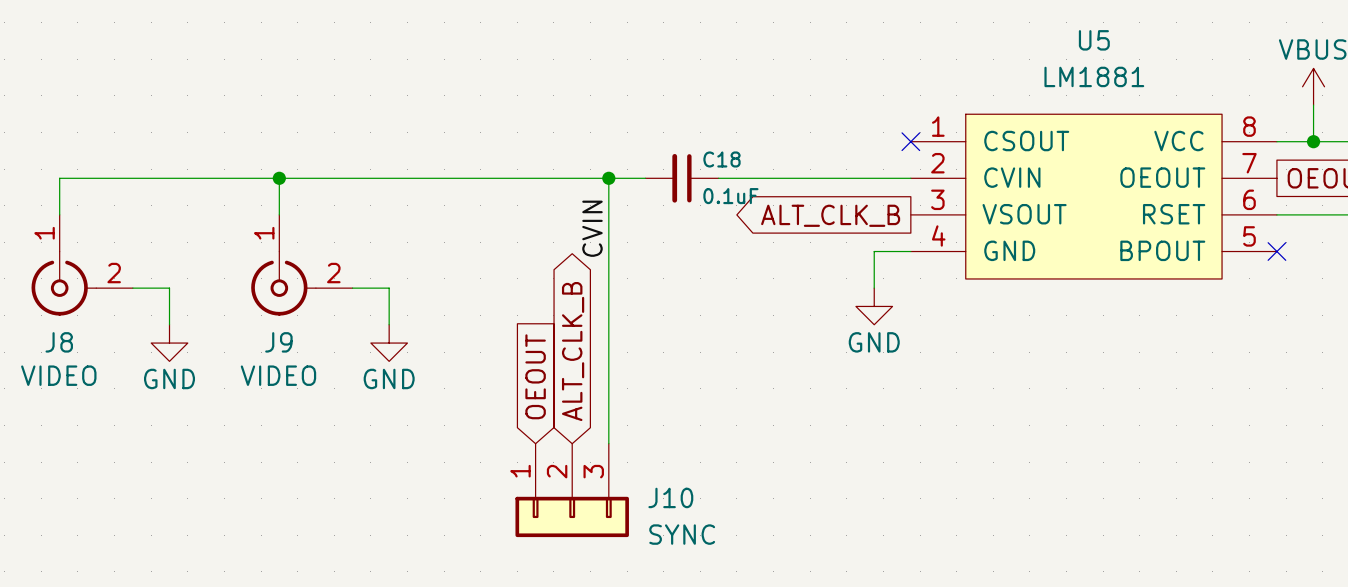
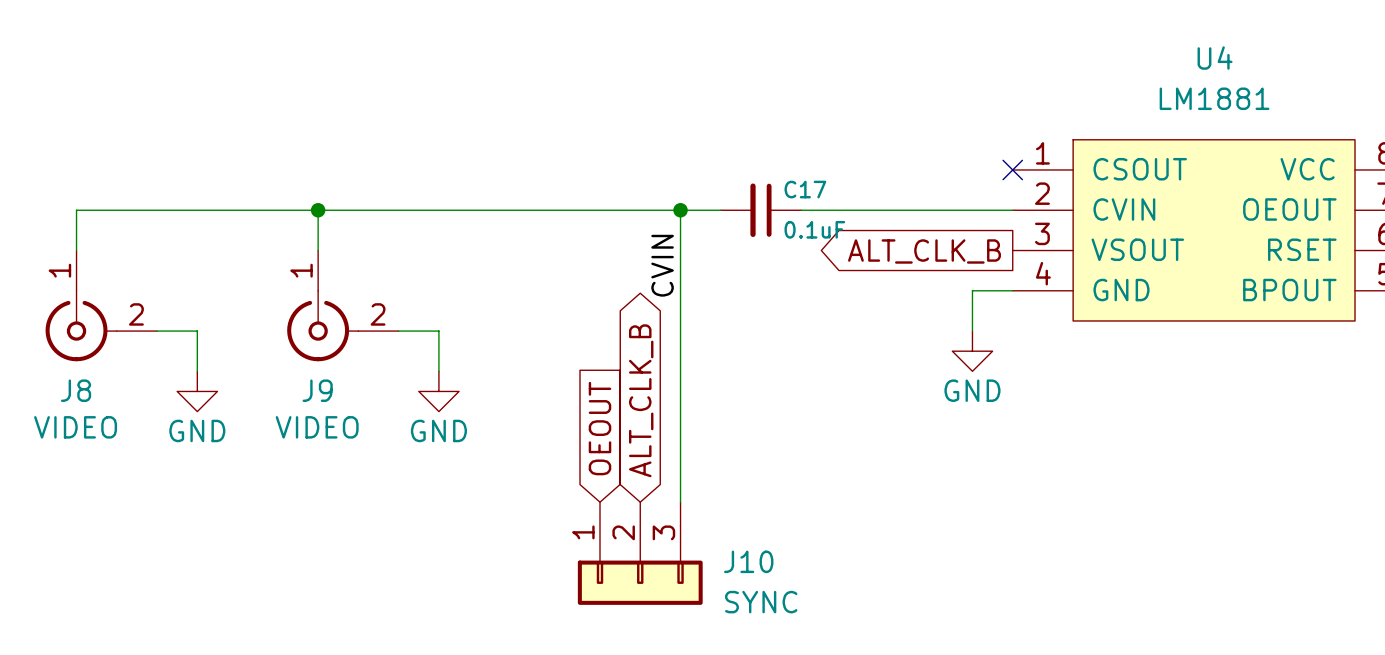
U5 name: U5 (1094, 40) -> U4 (1215, 58)
C18 name: C18 (721, 159) -> C17 (805, 189)

